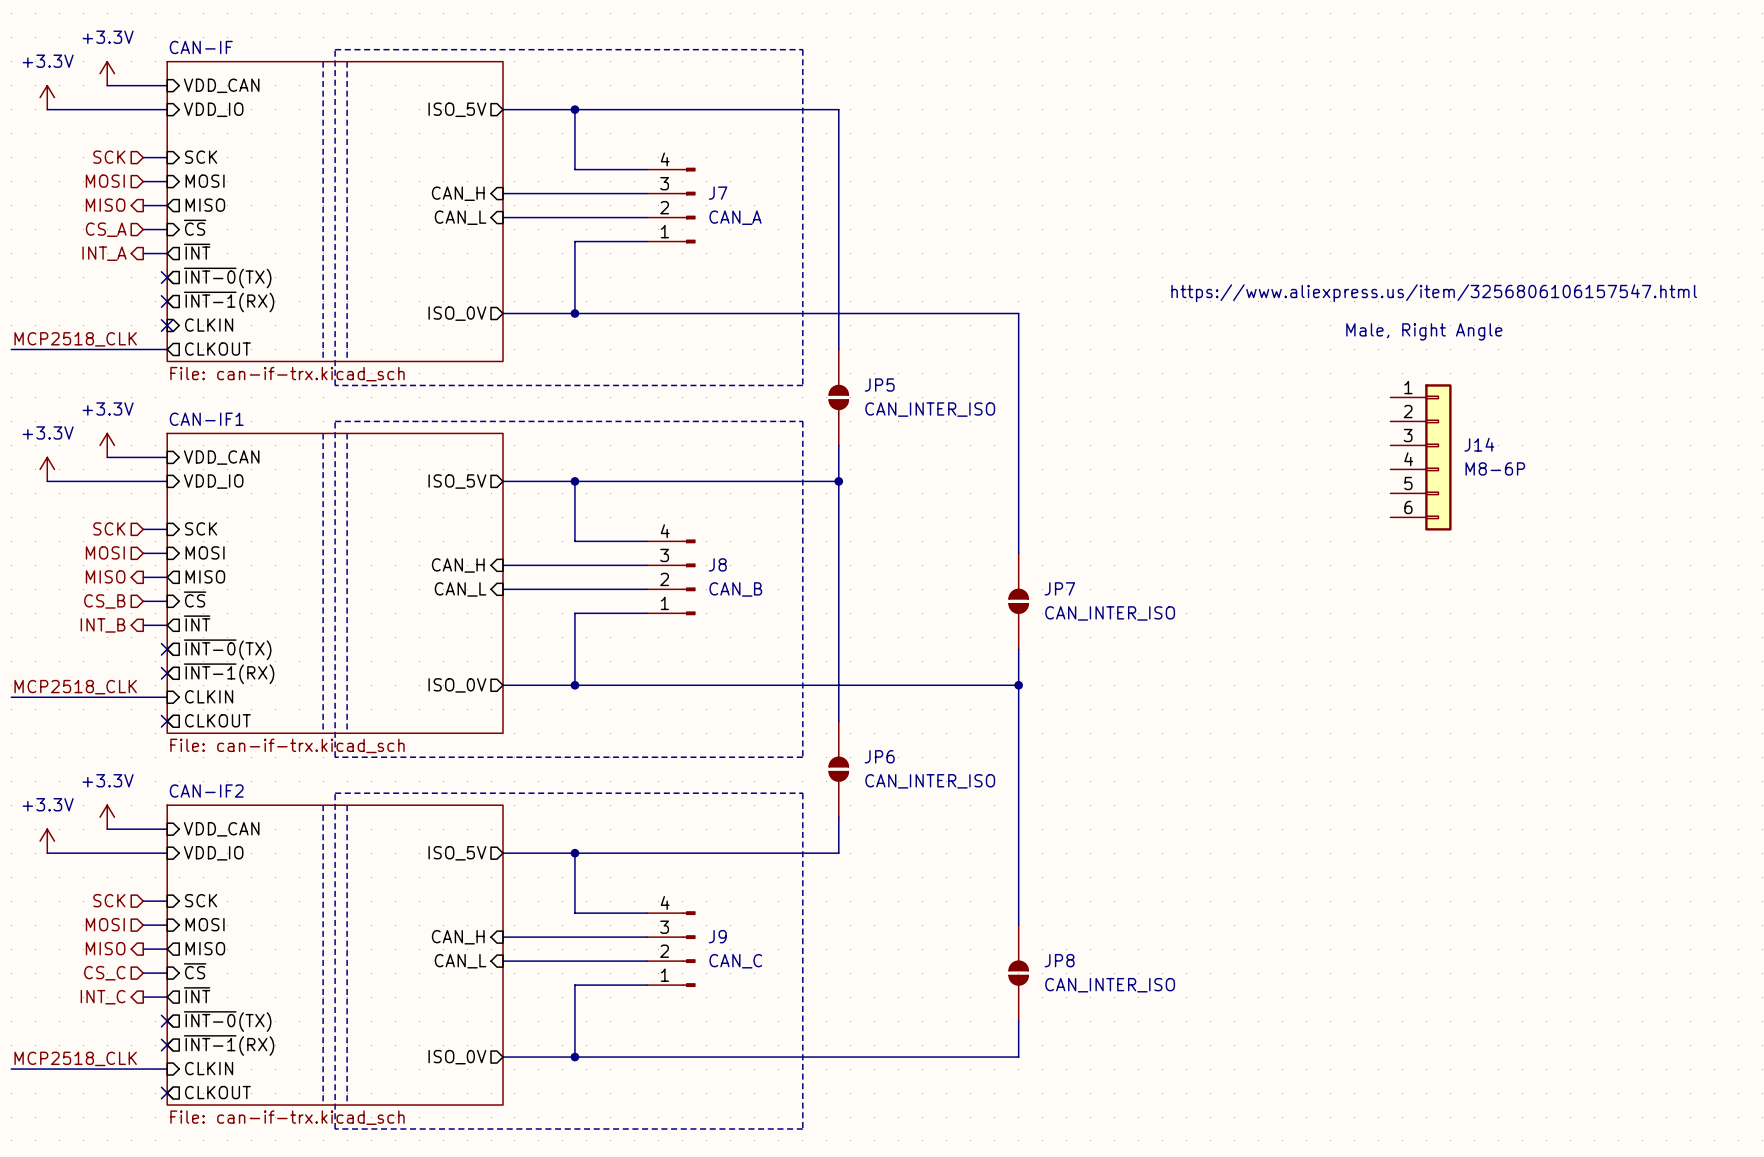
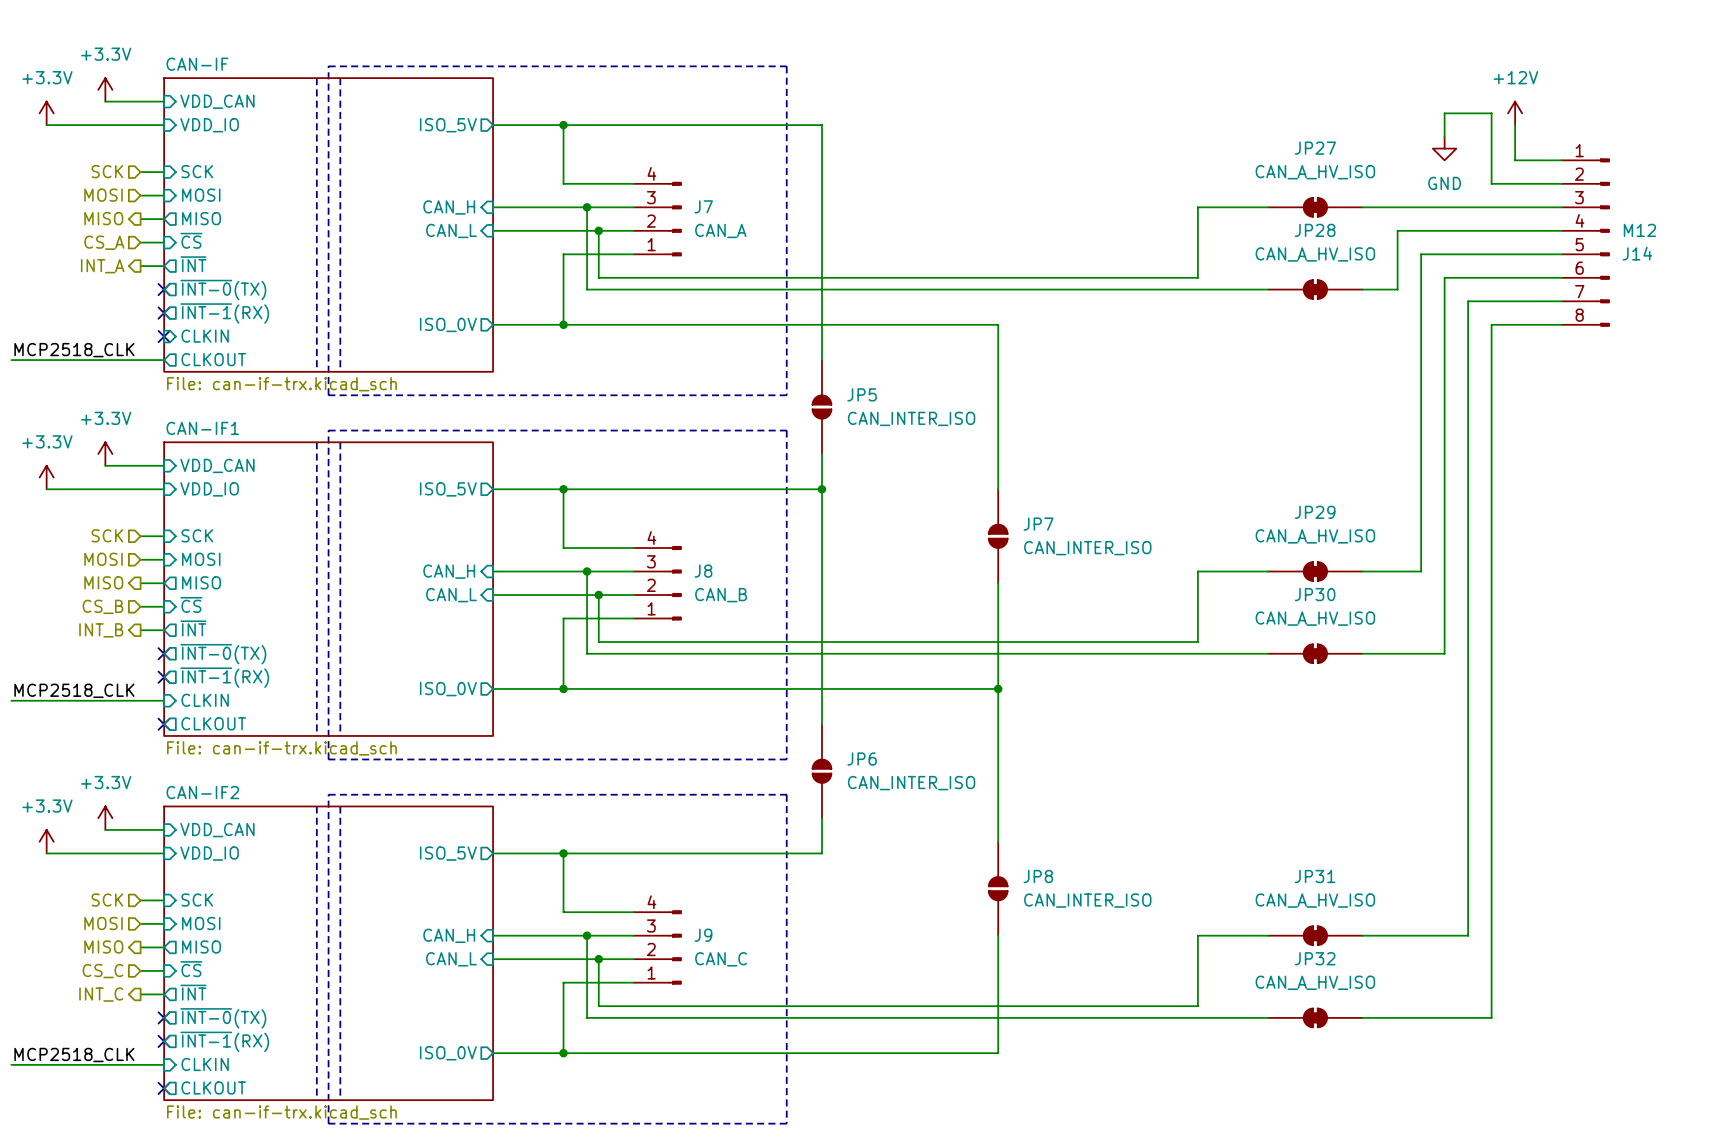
power symbol: none -> +12V (1515, 113)
wire: none -> (1515, 125) (1515, 160) (1562, 160)
wire: none -> (1444, 136) (1444, 113) (1491, 113) (1491, 183) (1562, 183)
power symbol: none -> GND (1444, 148)
wire: none -> (587, 207) (587, 289) (1268, 289)
junction: none -> (587, 207)
wire: none -> (1268, 207) (1197, 207) (1197, 277) (598, 277) (598, 230)
JP27: none -> CAN_A_HV_ISO (1315, 207)
wire: none -> (1362, 207) (1562, 207)
junction: none -> (598, 230)
wire: none -> (1562, 230) (1397, 230) (1397, 289) (1362, 289)
wire: none -> (1562, 254) (1421, 254) (1421, 571) (1362, 571)
wire: none -> (1562, 277) (1444, 277) (1444, 653) (1362, 653)
JP28: none -> CAN_A_HV_ISO (1315, 289)
wire: none -> (1562, 301) (1468, 301) (1468, 935) (1362, 935)
text: https://www.aliexpress.us/item/3256806106157547.html (1434, 293) -> none
wire: none -> (1562, 324) (1491, 324) (1491, 1017) (1362, 1017)
text: Male, Right Angle (1424, 331) -> none
J14 symbol: [1390, 384, 1452, 531] -> [1562, 158, 1610, 327]
J14 name position: J14 (1479, 444) -> J14 (1637, 253)
J14 value: M8-6P (1495, 468) -> M12 (1639, 230)
wire: none -> (587, 571) (587, 653) (1268, 653)
junction: none -> (587, 571)
wire: none -> (1268, 571) (1197, 571) (1197, 642) (598, 642) (598, 595)
JP29: none -> CAN_A_HV_ISO (1315, 571)
junction: none -> (598, 595)
JP7 position: (1018, 601) -> (998, 536)
JP30: none -> CAN_A_HV_ISO (1315, 653)
wire: none -> (587, 935) (587, 1017) (1268, 1017)
junction: none -> (587, 935)
wire: none -> (1268, 935) (1197, 935) (1197, 1006) (598, 1006) (598, 959)
JP31: none -> CAN_A_HV_ISO (1315, 935)
junction: none -> (598, 959)
JP8 position: (1018, 973) -> (998, 888)
JP32: none -> CAN_A_HV_ISO (1315, 1017)

